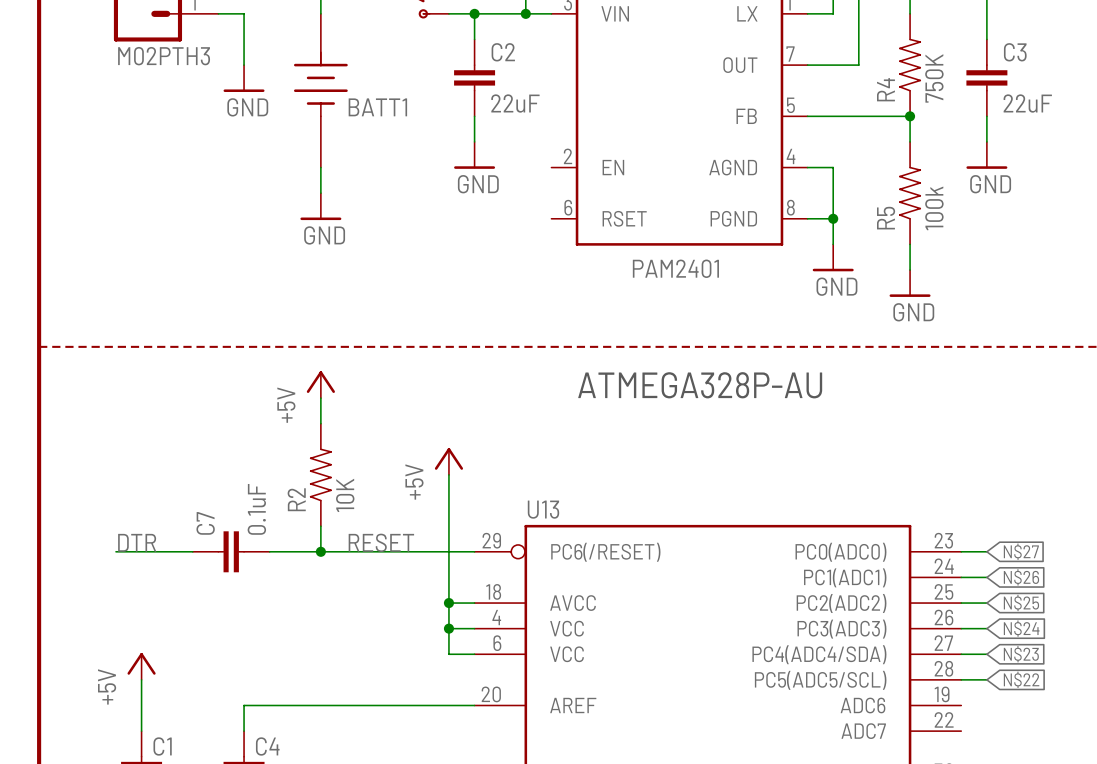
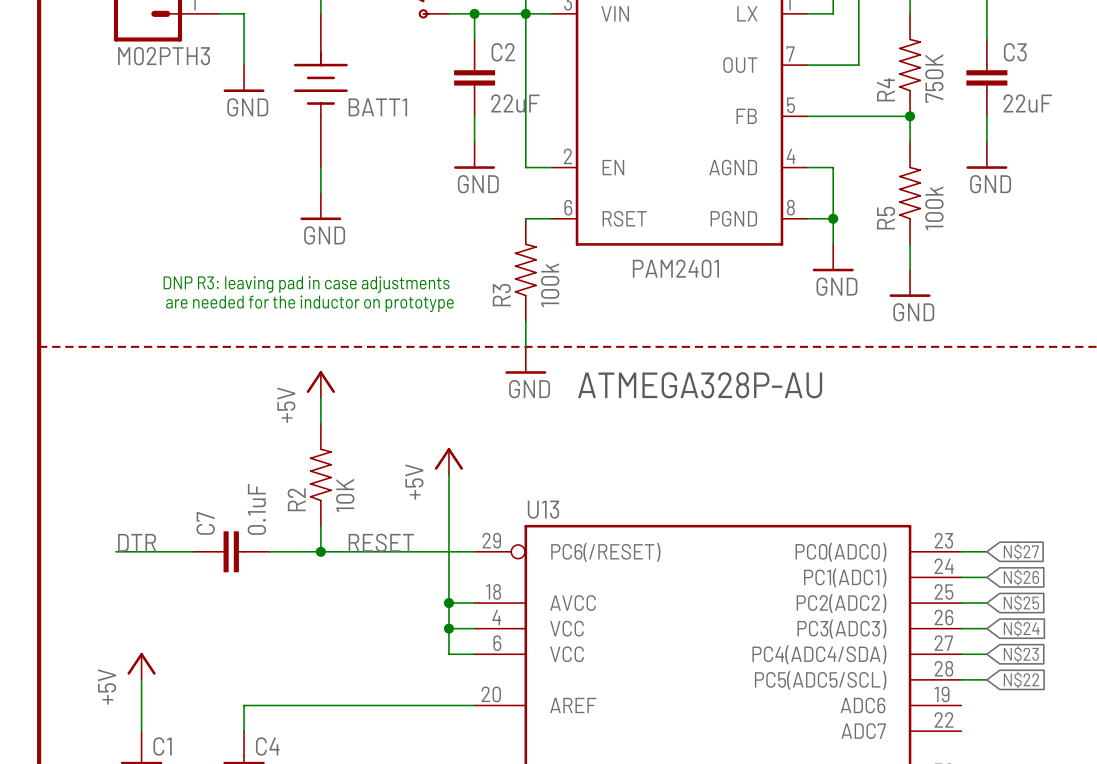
wire: none -> (525, 13) (525, 167) (551, 167)
wire: none -> (525, 218) (551, 218)
R3: none -> 100k (525, 270)
text: none -> DNP R3: leaving pad in case adjustments (306, 284)
text: none -> are needed for the inductor on prototype (309, 303)
wire: none -> (525, 321) (525, 346)
power symbol: none -> GND (525, 360)

